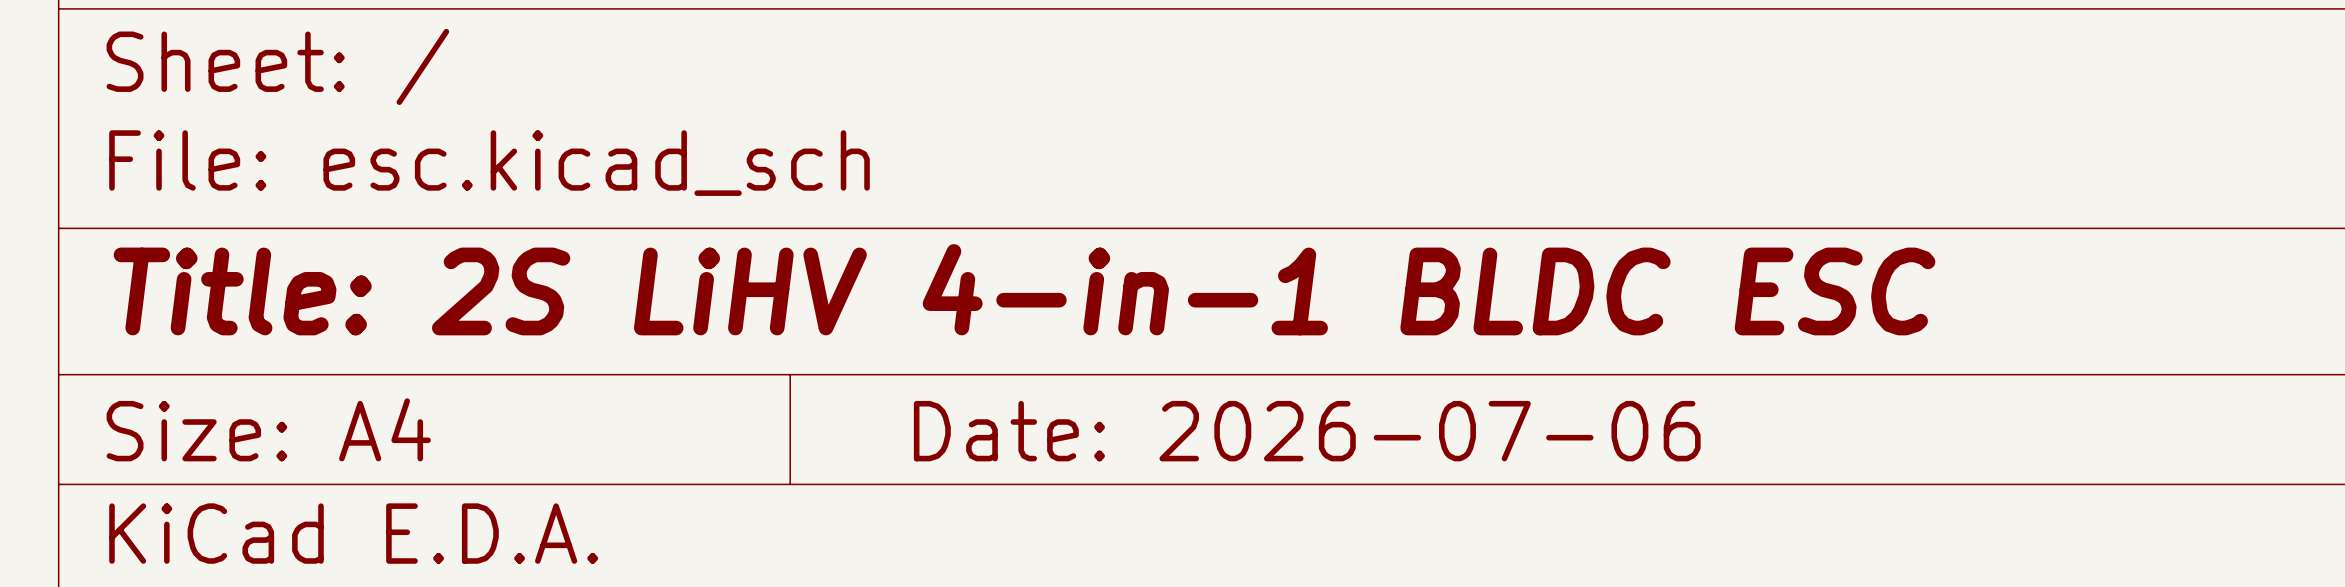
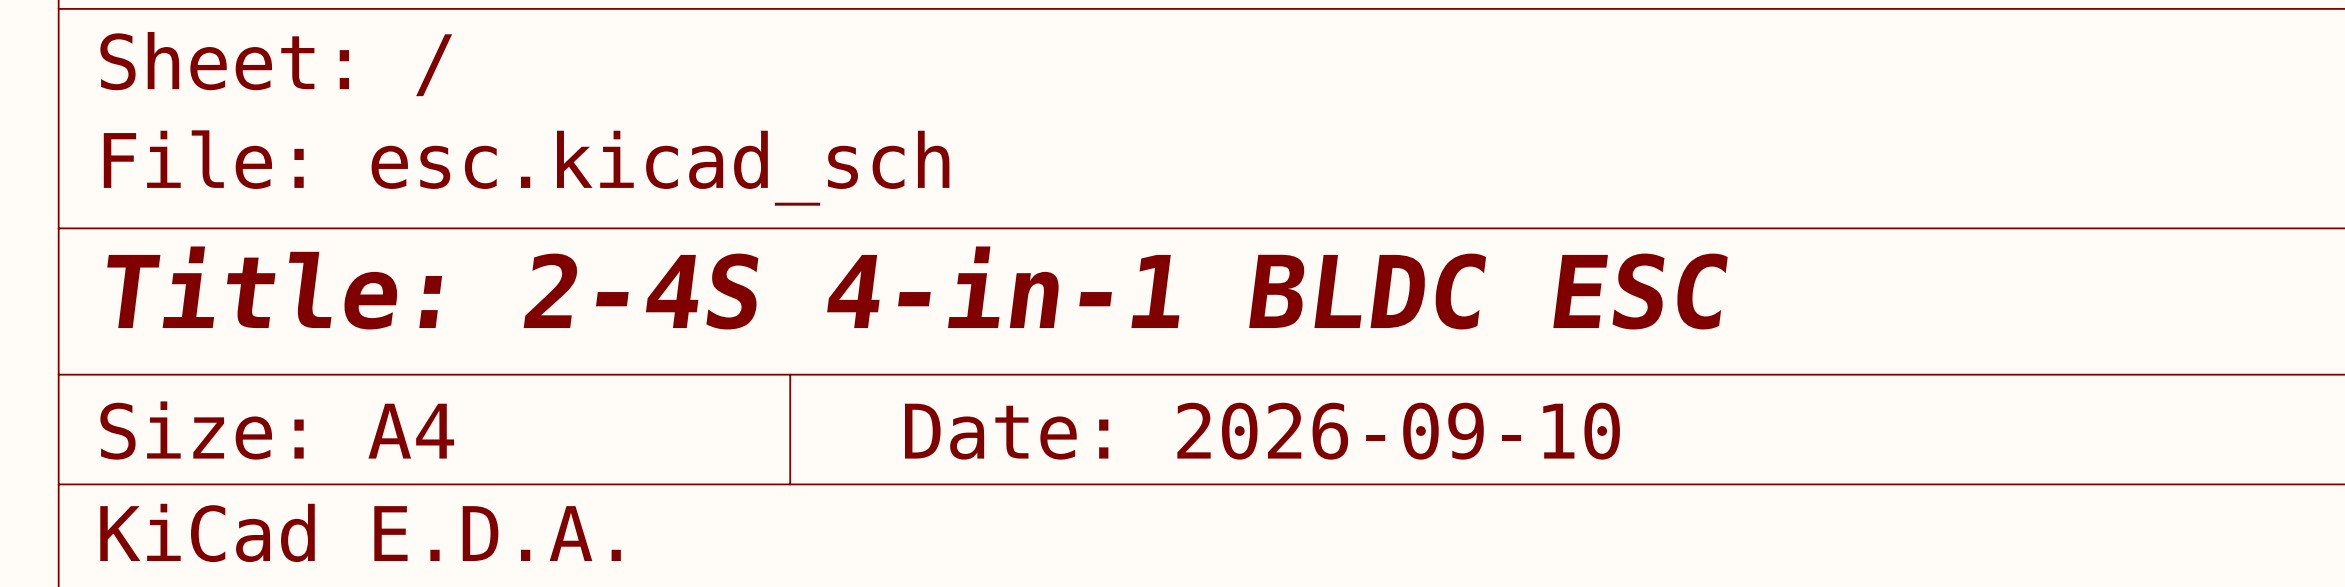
title block: Title: 2S LiHV 4-in-1 BLDC ESC (1024, 289) -> Title: 2-4S 4-in-1 BLDC ESC (917, 287)
title block: Date: 2026-07-06 (1307, 431) -> Date: 2026-09-10 (1262, 431)

